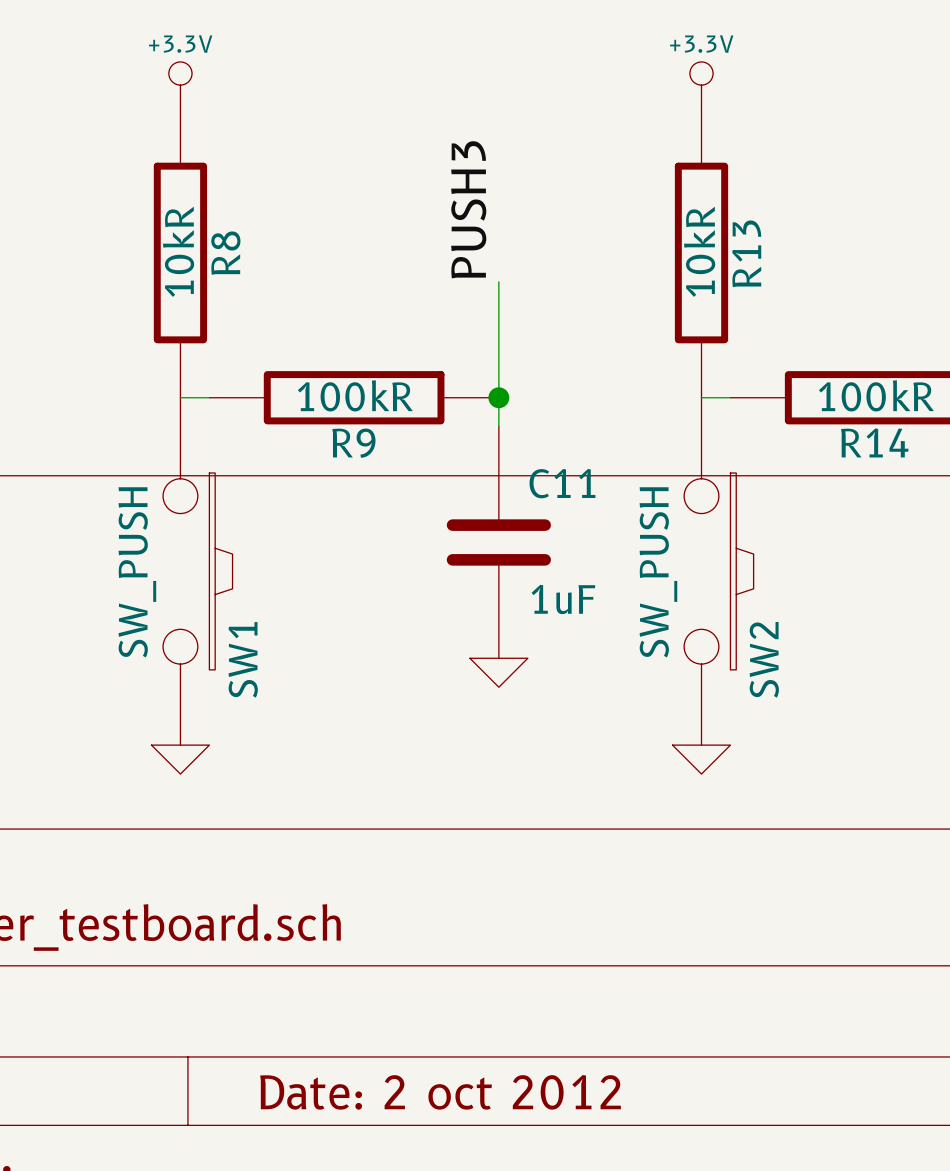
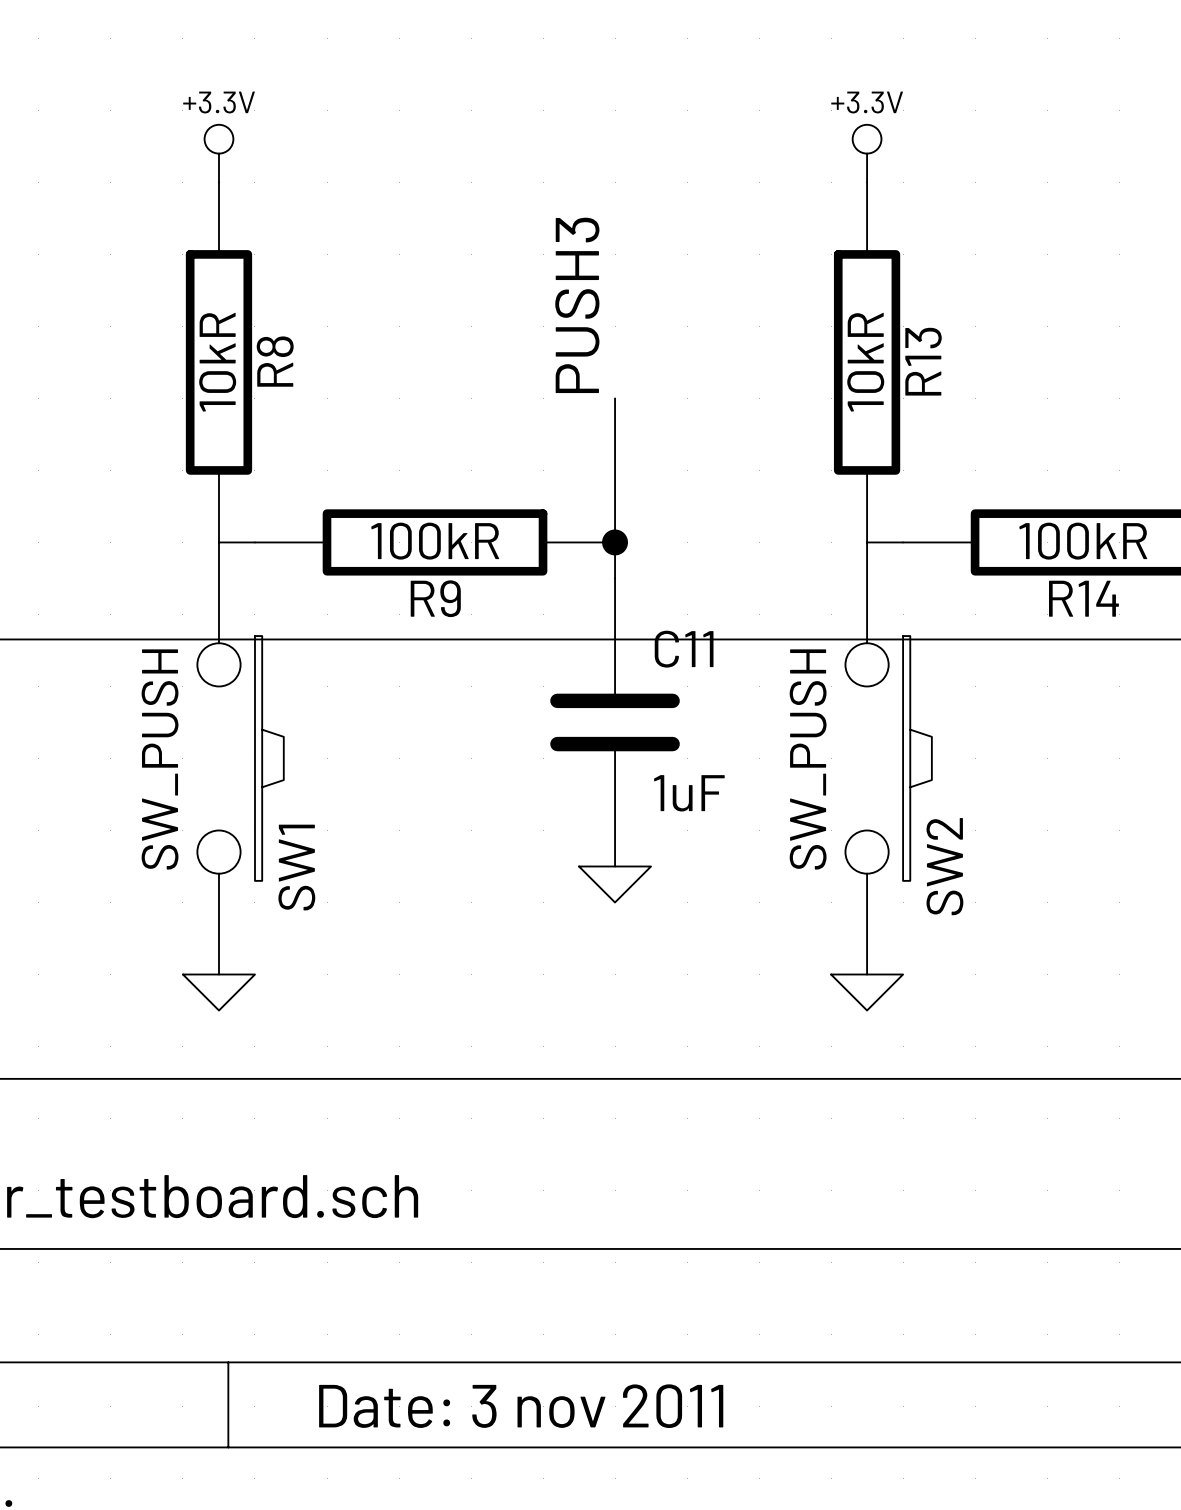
title block: Date: 2 oct 2012 (440, 1092) -> Date: 3 nov 2011 (521, 1406)

